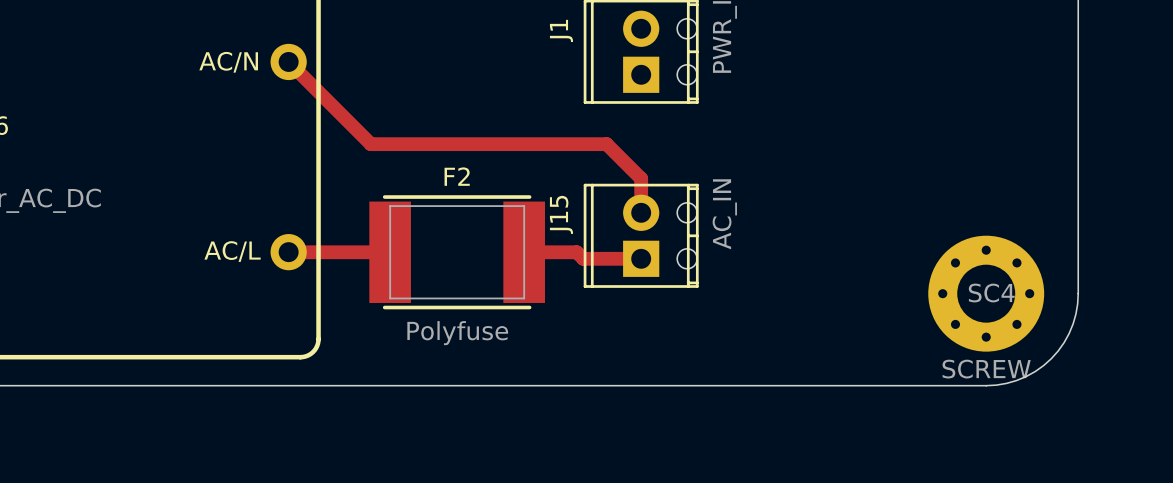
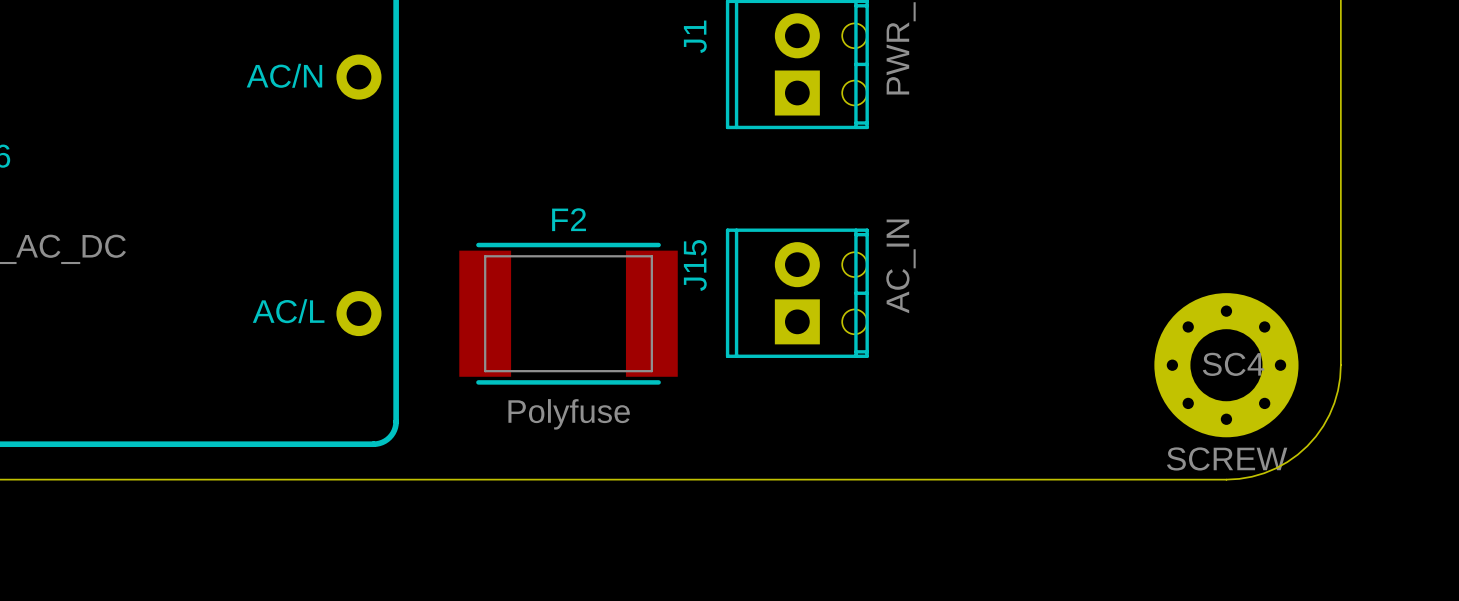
track: (288, 61) (370, 144) (606, 144) (641, 178) (641, 212) -> none
track: (288, 252) (390, 252) -> none
track: (524, 252) (576, 252) (583, 258) (641, 258) -> none

